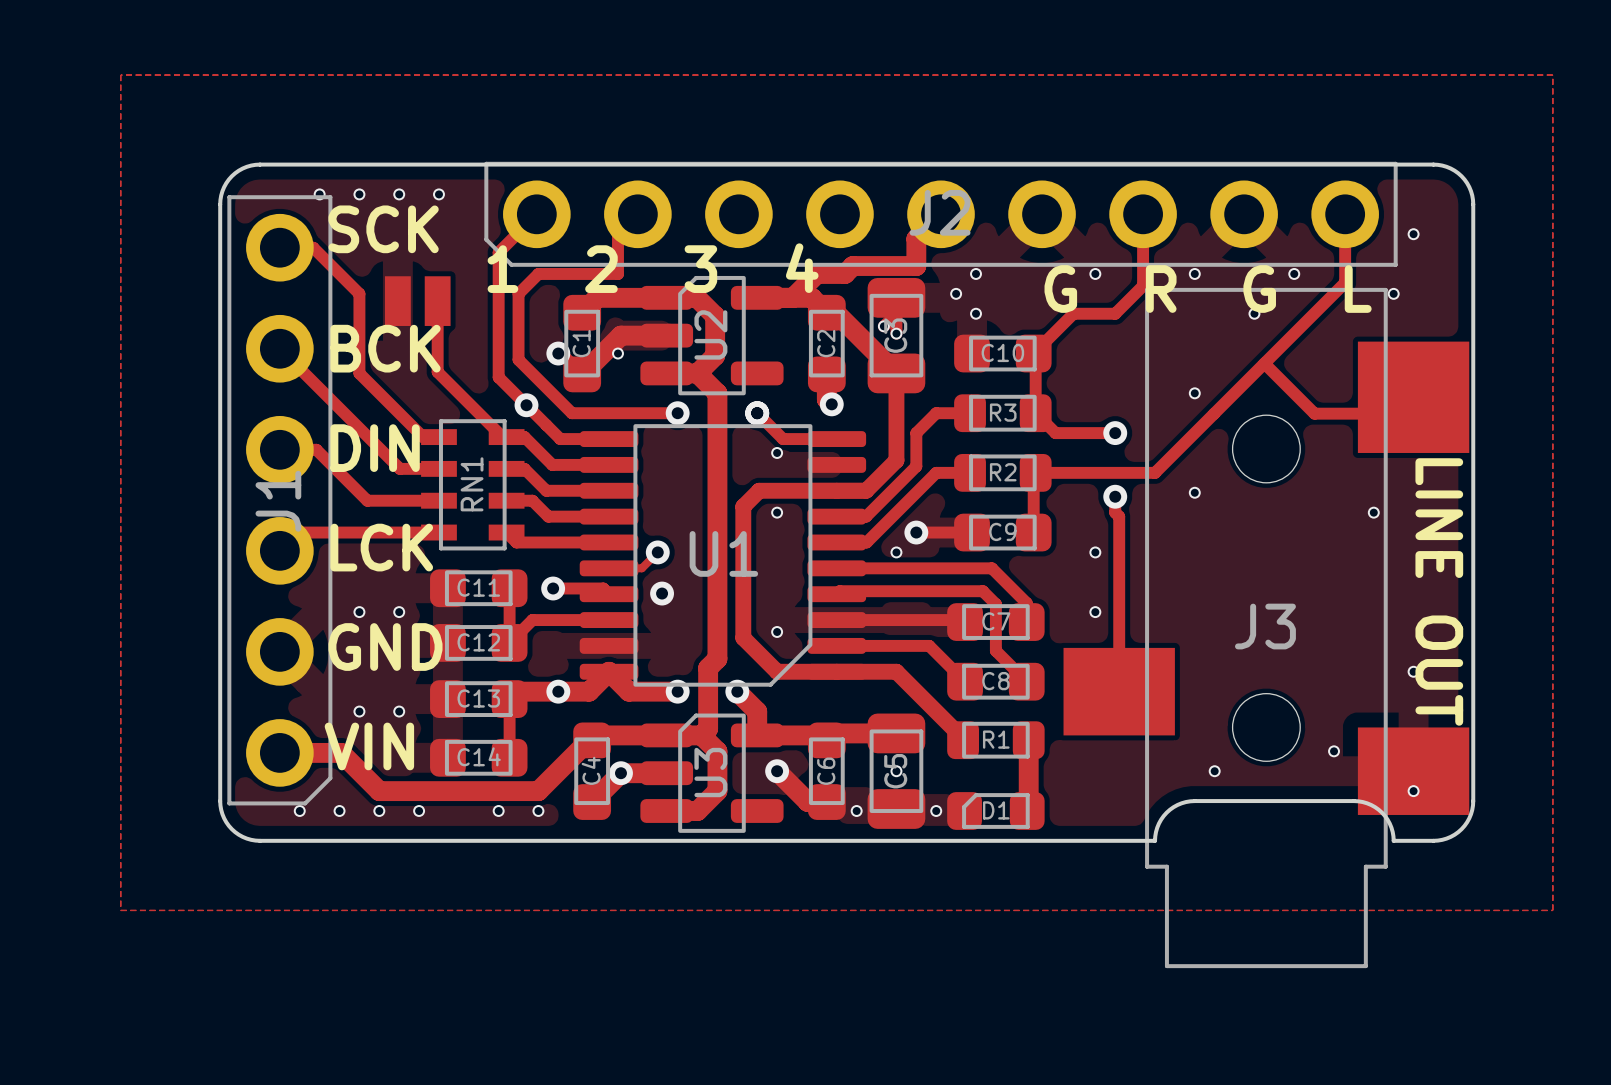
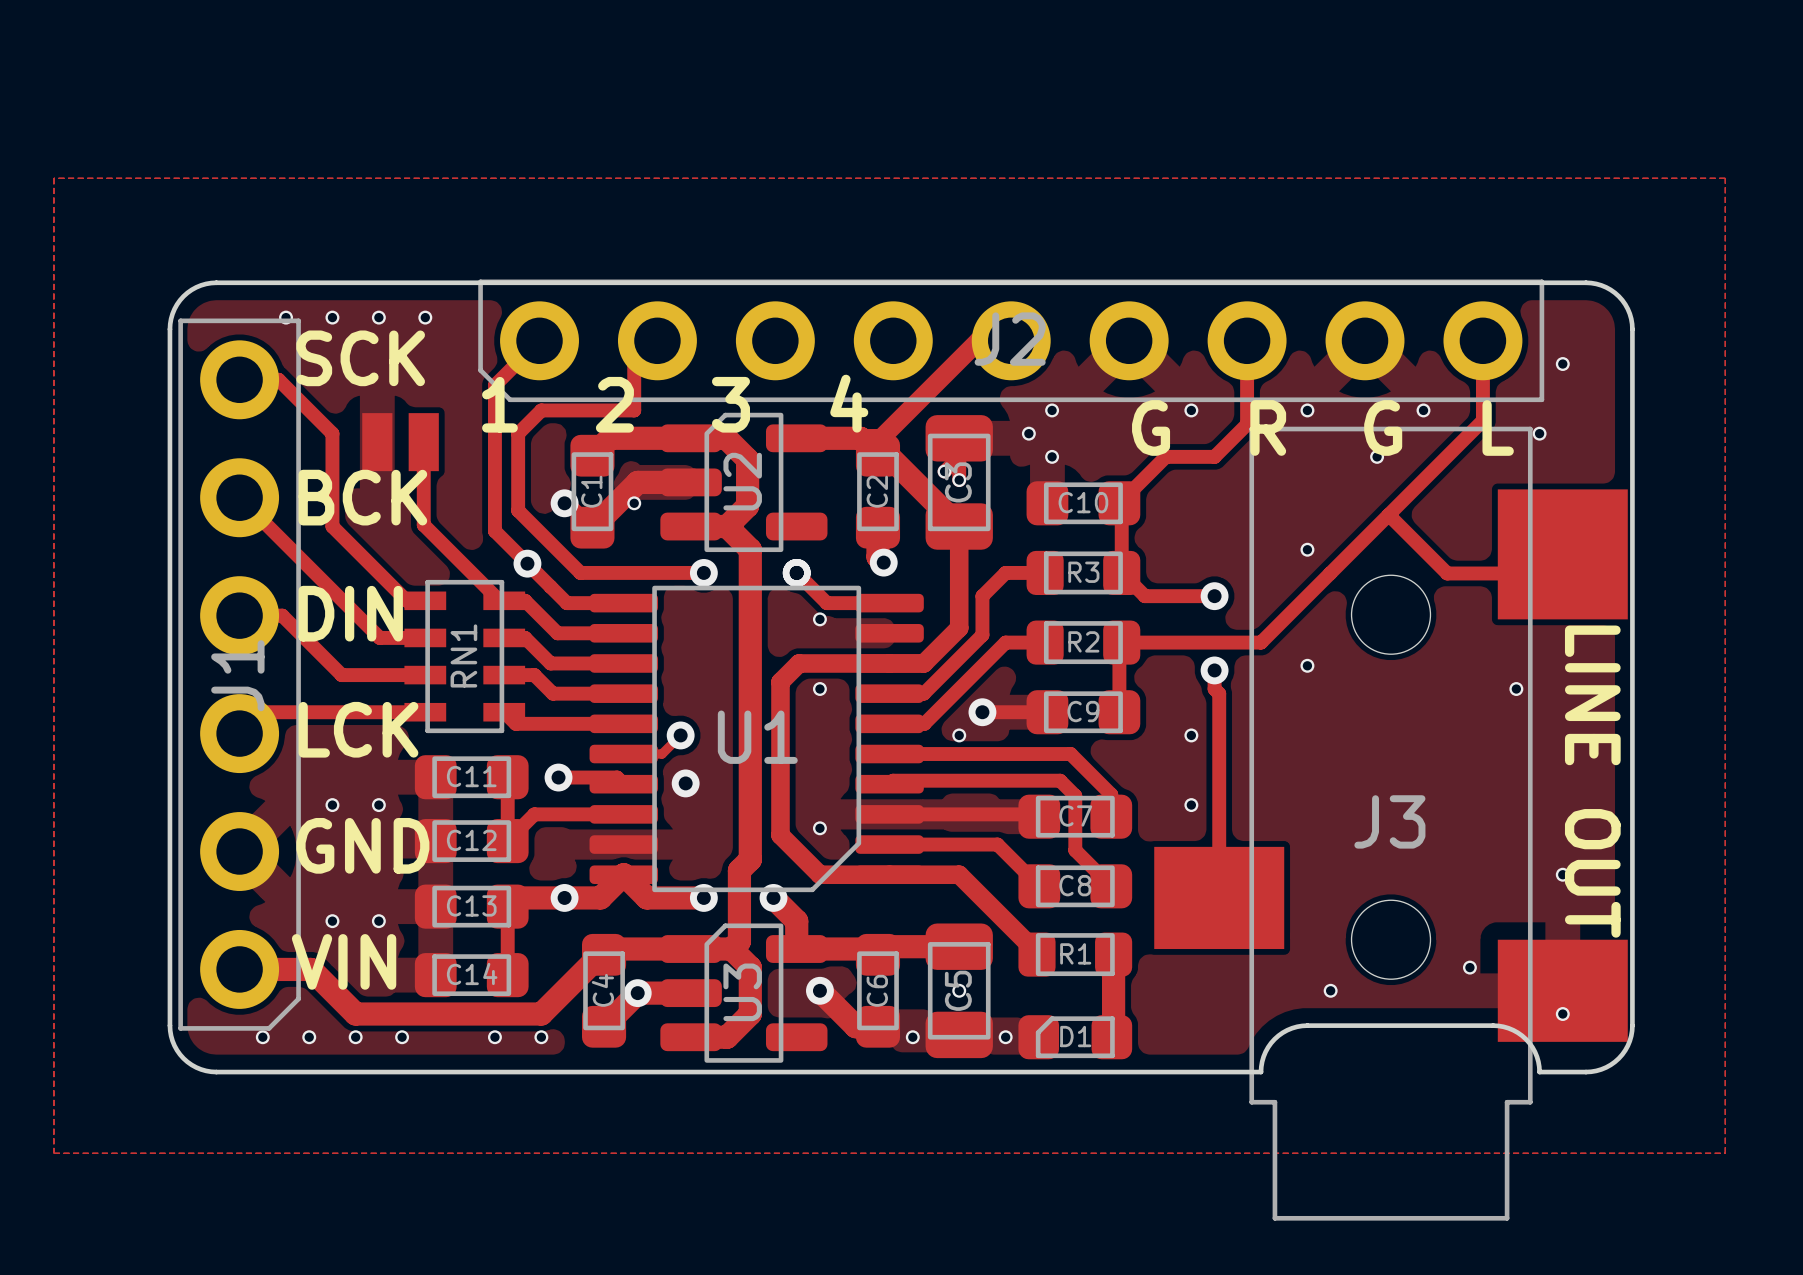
track: (941, 214) (916, 238) (916, 266) (852, 266) (844, 273) (816, 273) (793, 297) -> (1011, 340) (978, 340) (881, 438) (796, 438)

